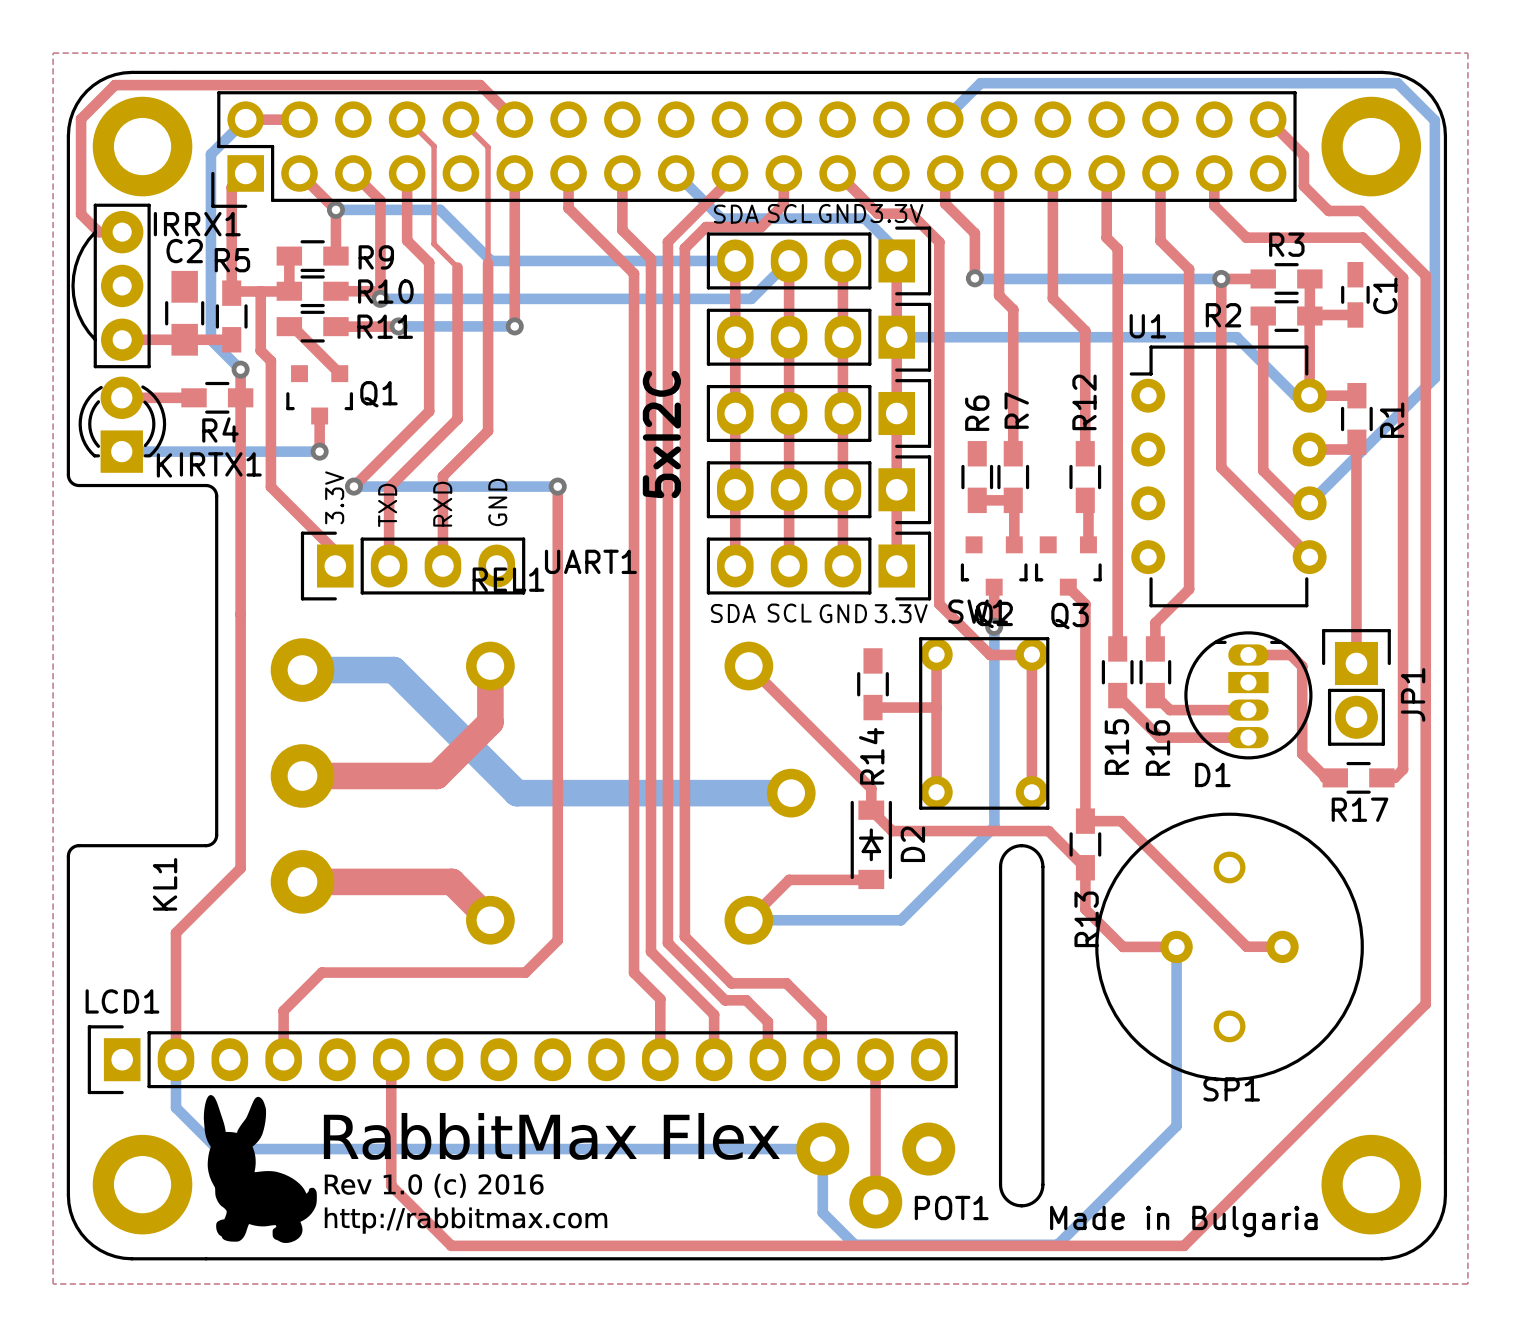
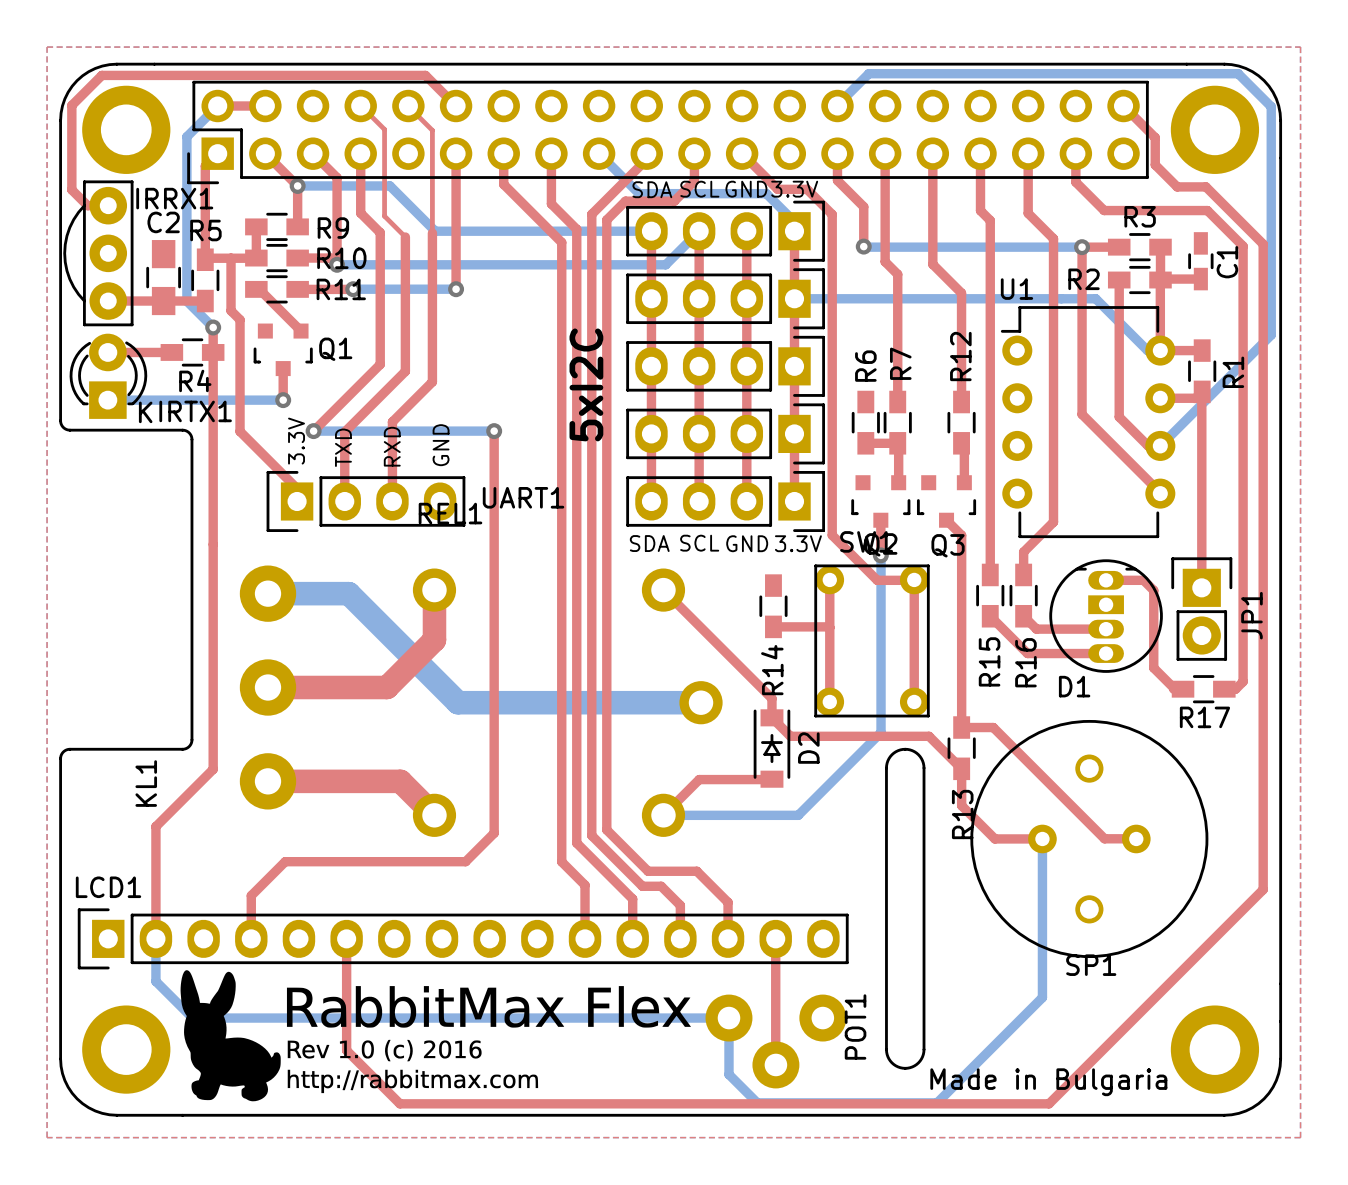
POT1 name rotation: 0° (951, 1208) -> 90° counterclockwise (855, 1026)

